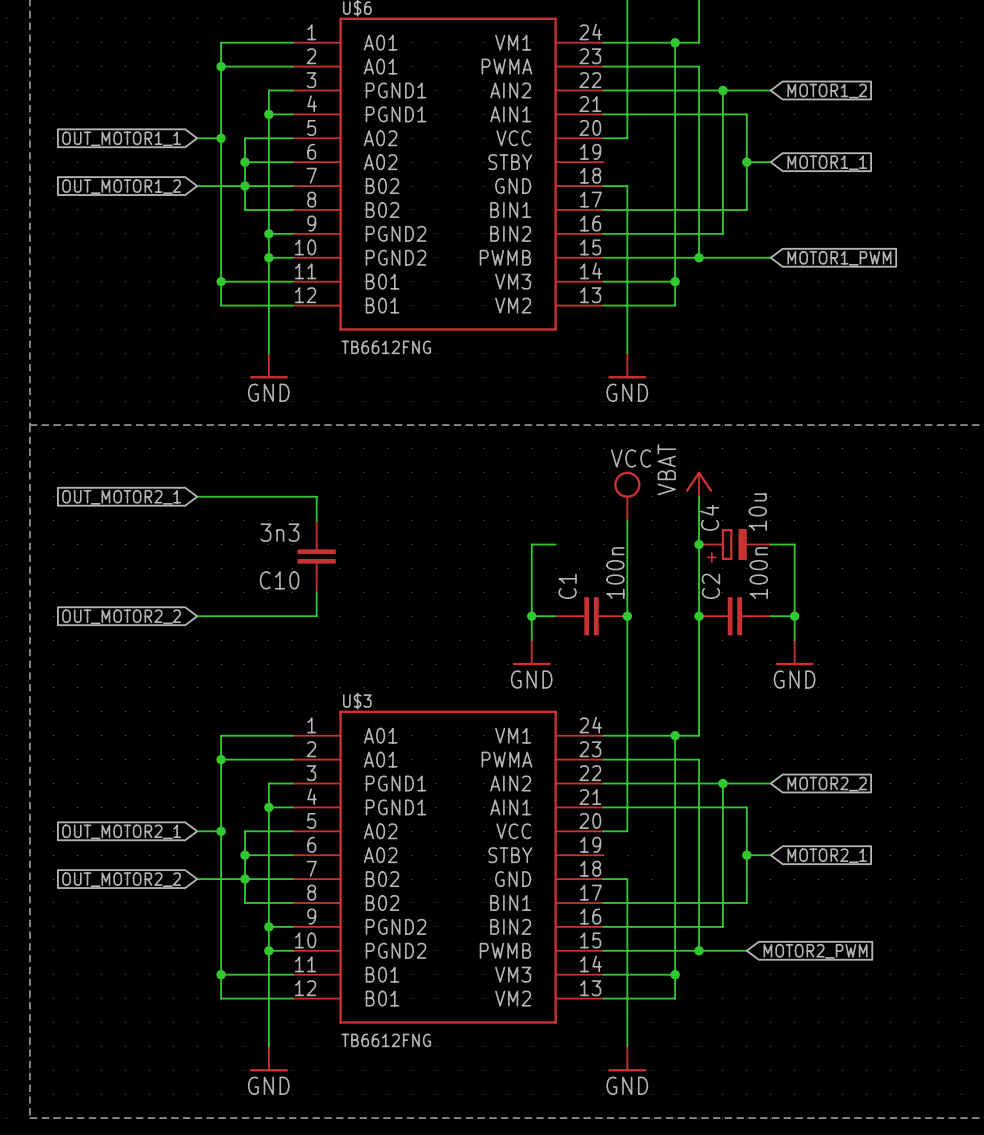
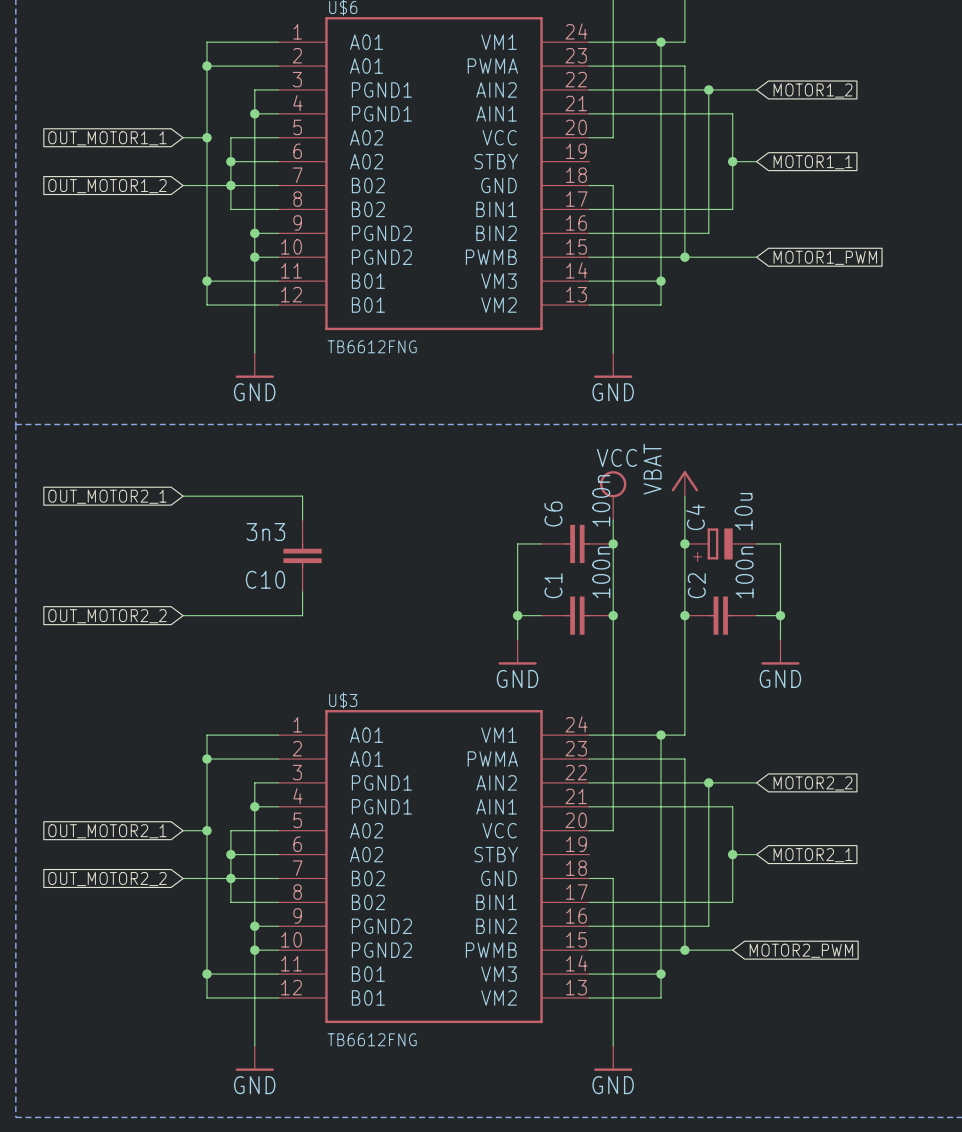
C6: none -> 100n (577, 543)
junction: none -> (613, 543)

